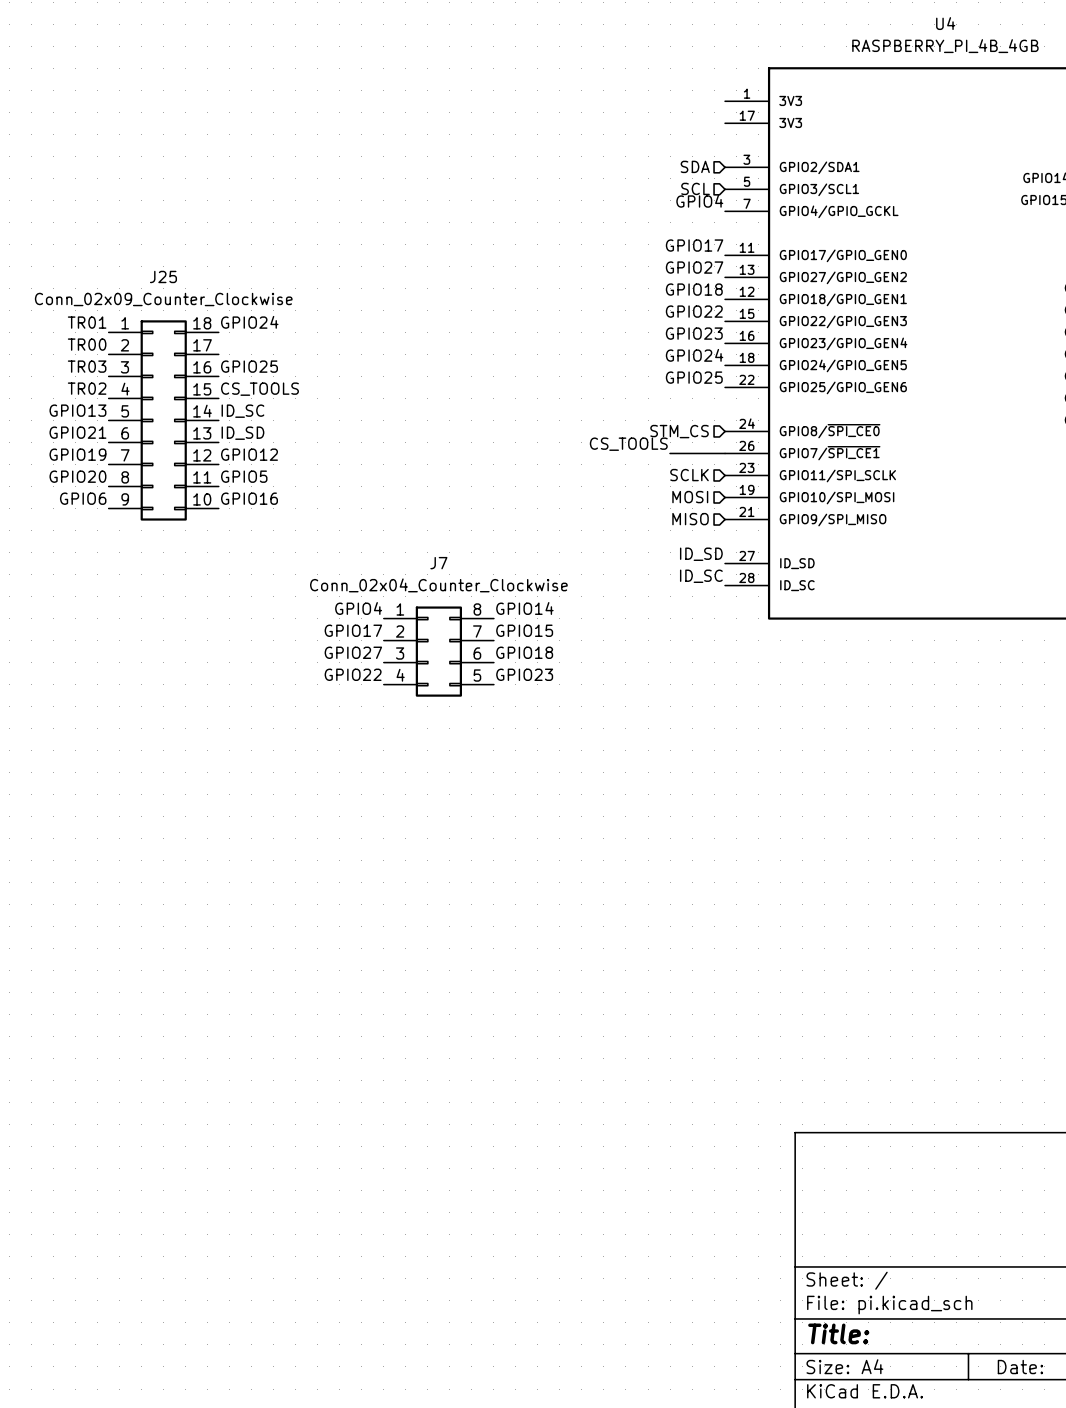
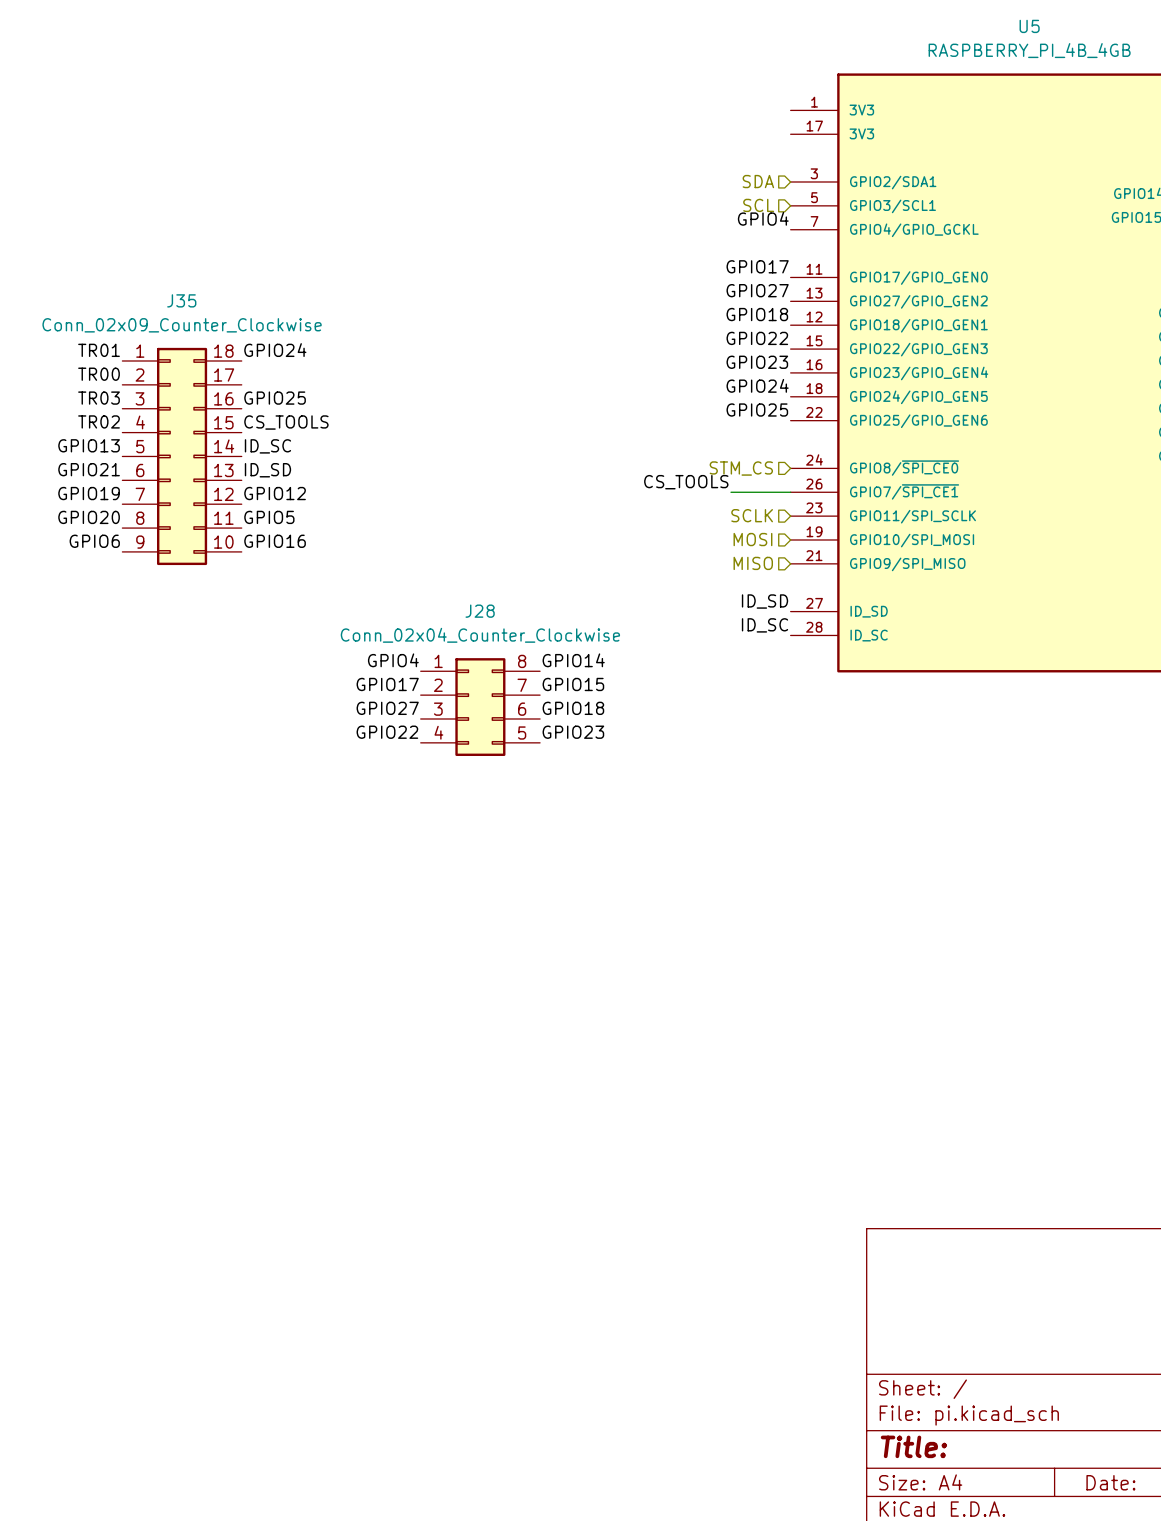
U4 name: U4 (945, 23) -> U5 (1029, 26)
J25 name: J25 (163, 276) -> J35 (181, 300)
J7 name: J7 (438, 563) -> J28 (480, 611)

